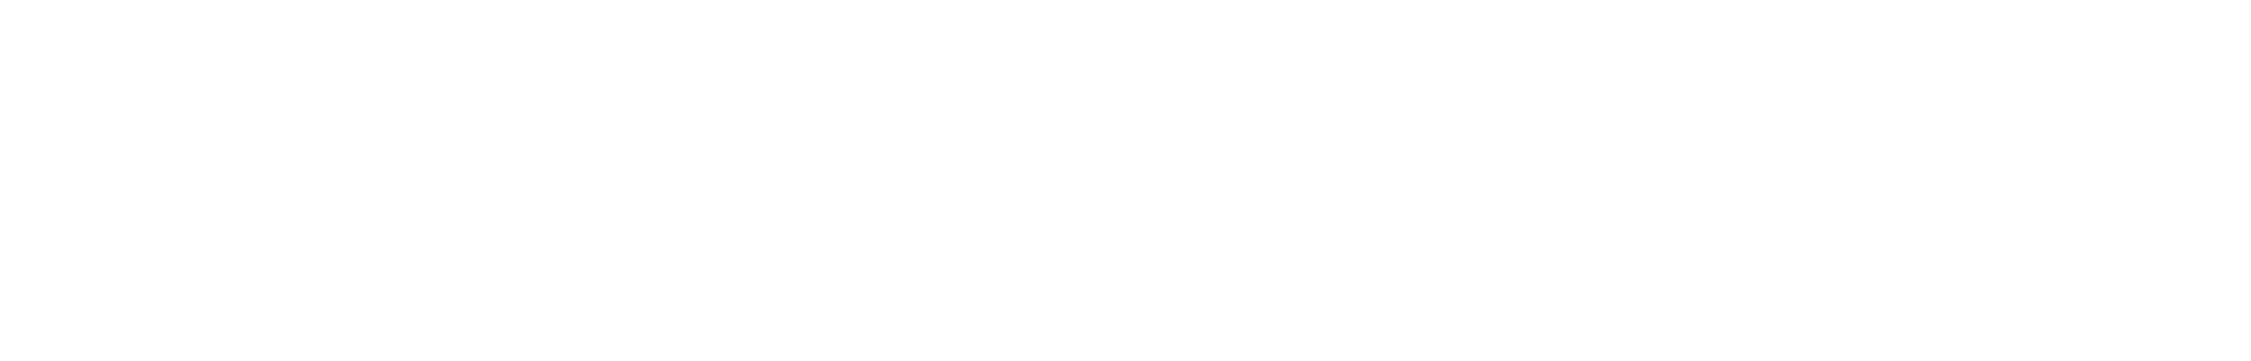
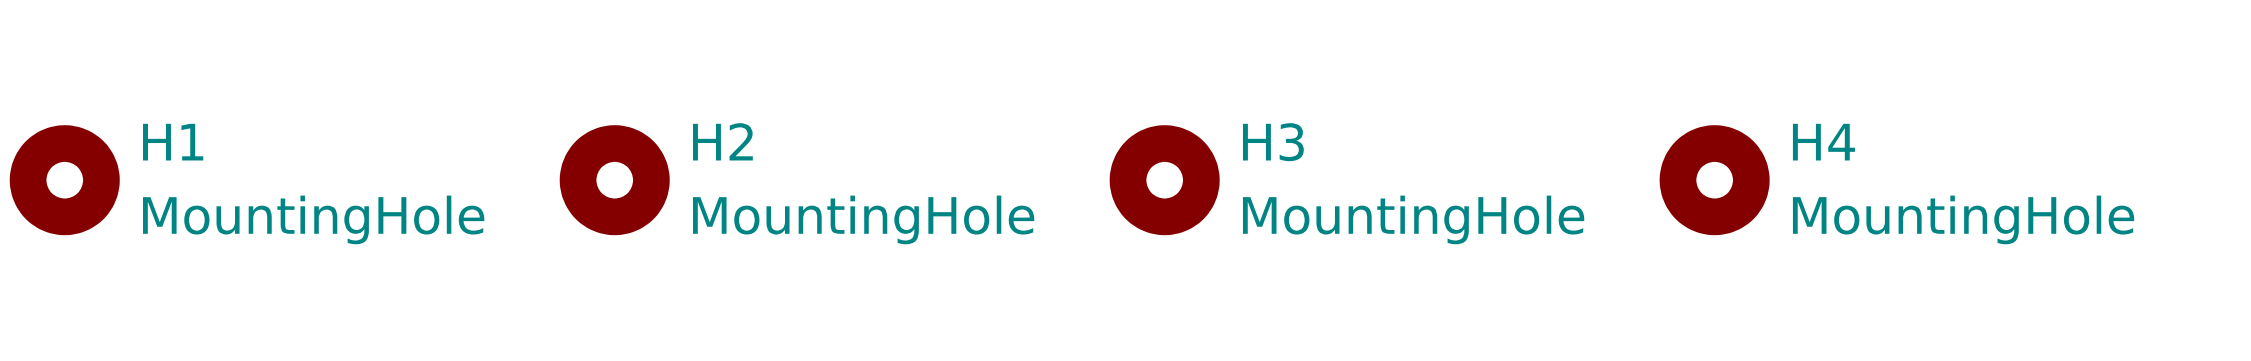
H1: none -> MountingHole (64, 180)
H2: none -> MountingHole (614, 180)
H3: none -> MountingHole (1164, 180)
H4: none -> MountingHole (1714, 180)

